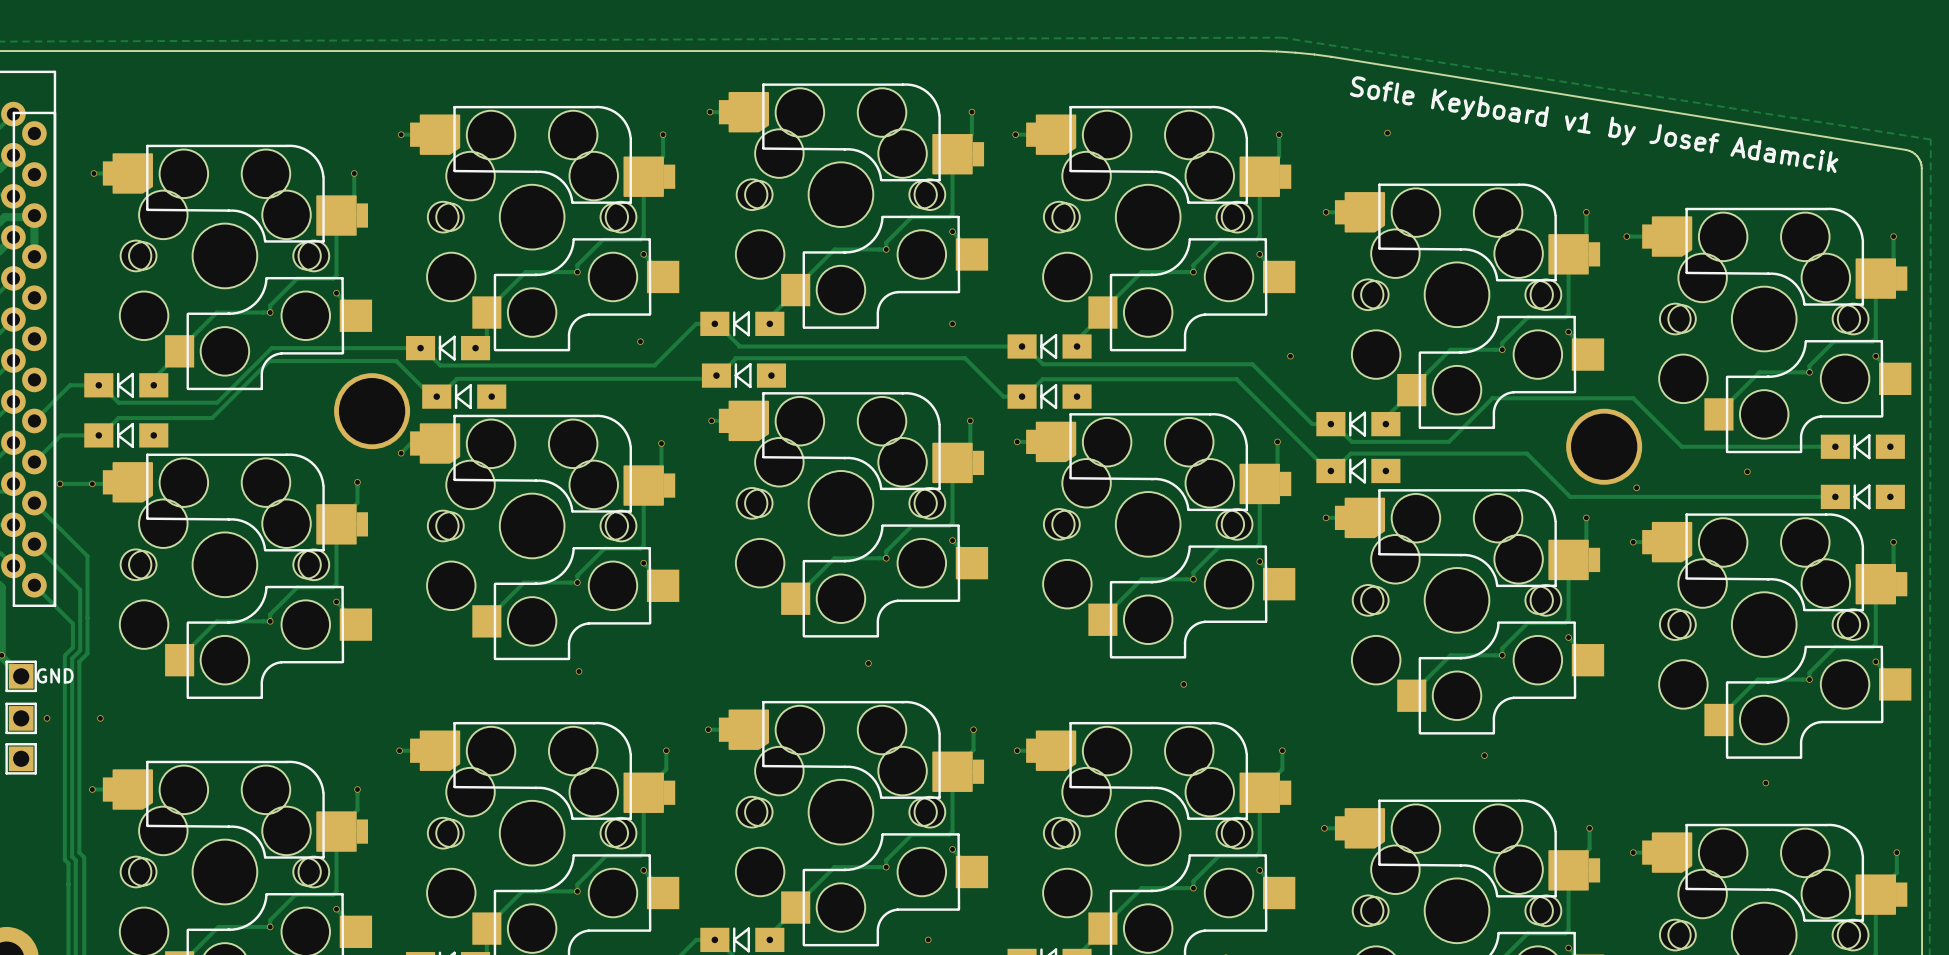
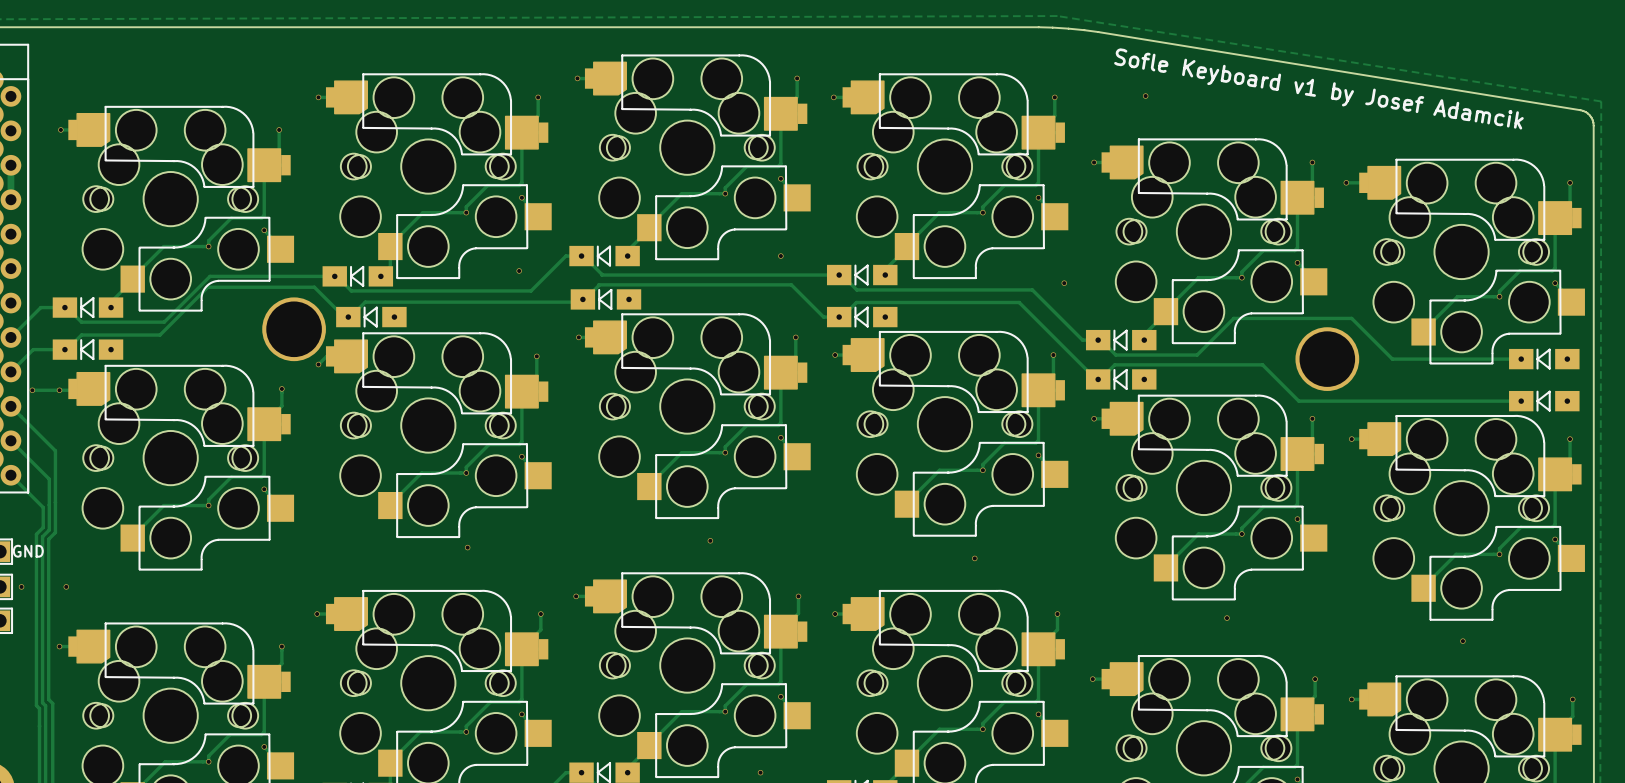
via: (1747, 471) -> none
via: (1636, 487) -> none

